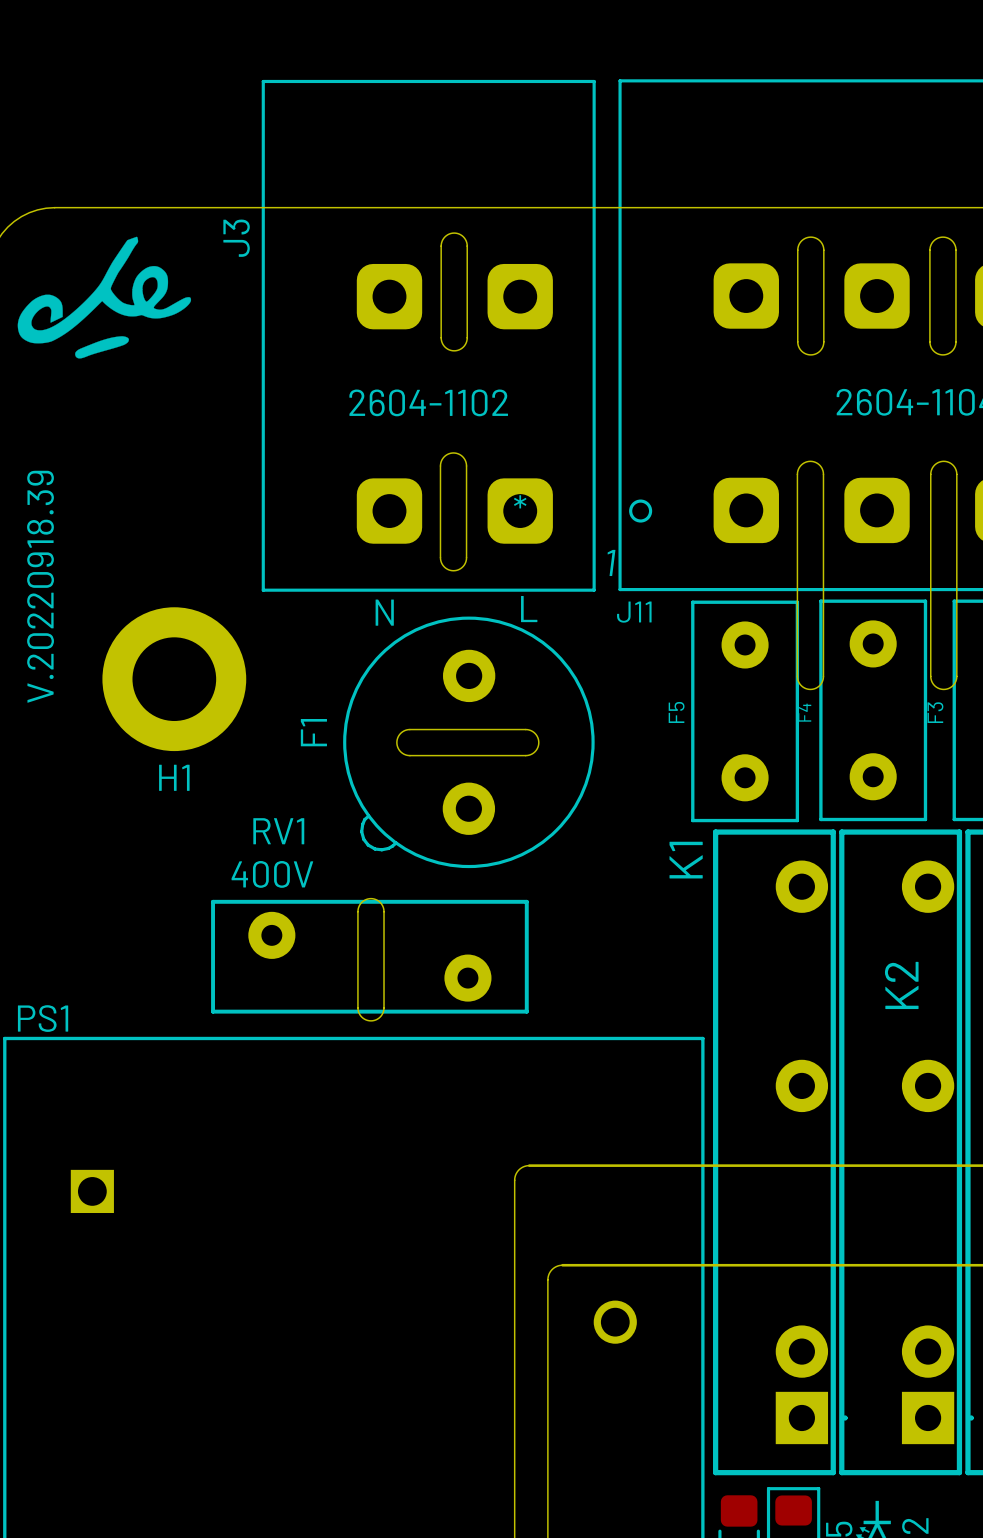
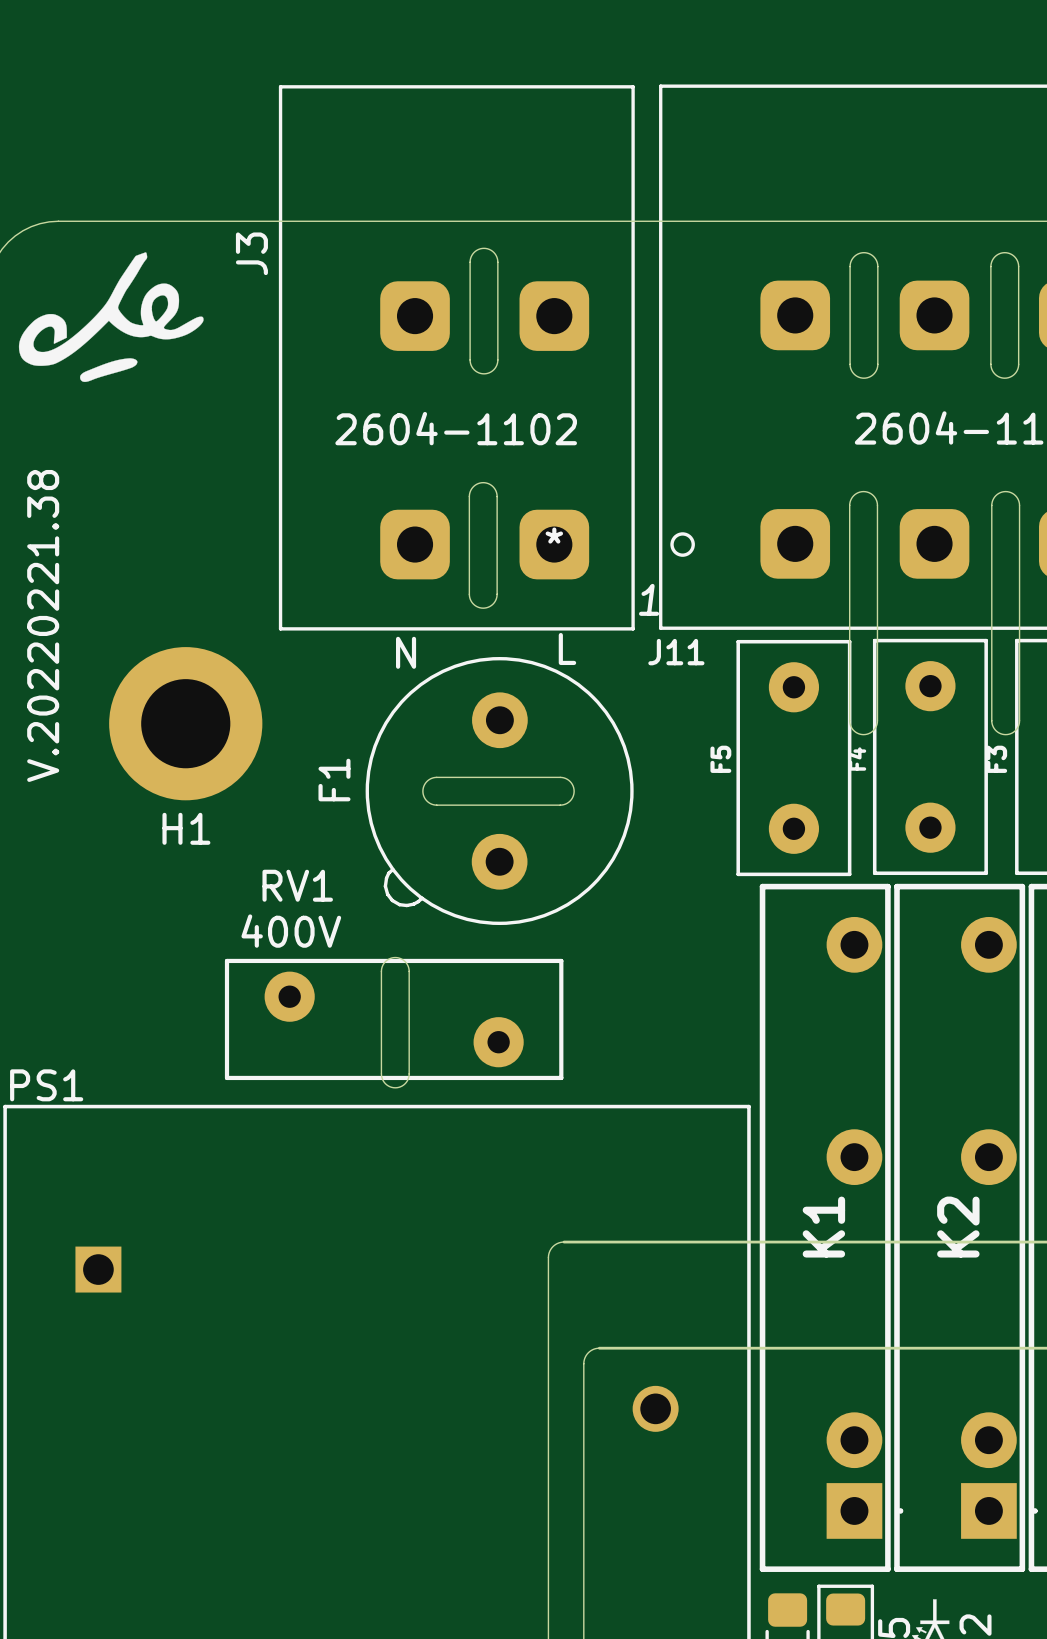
text: V.20220918.39 (40, 586) -> V.20220221.38 (43, 625)
K1 name position: K1 (686, 860) -> K1 (823, 1227)
K2 name position: K2 (901, 985) -> K2 (958, 1227)

